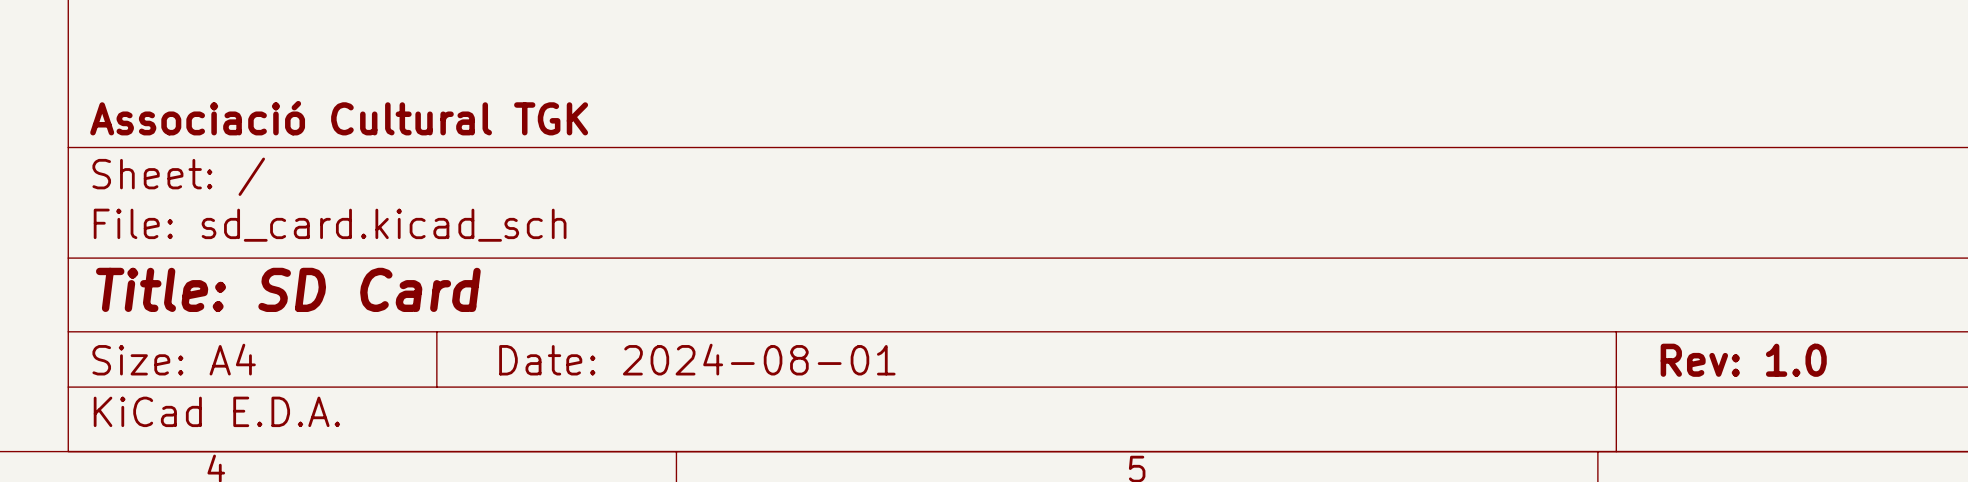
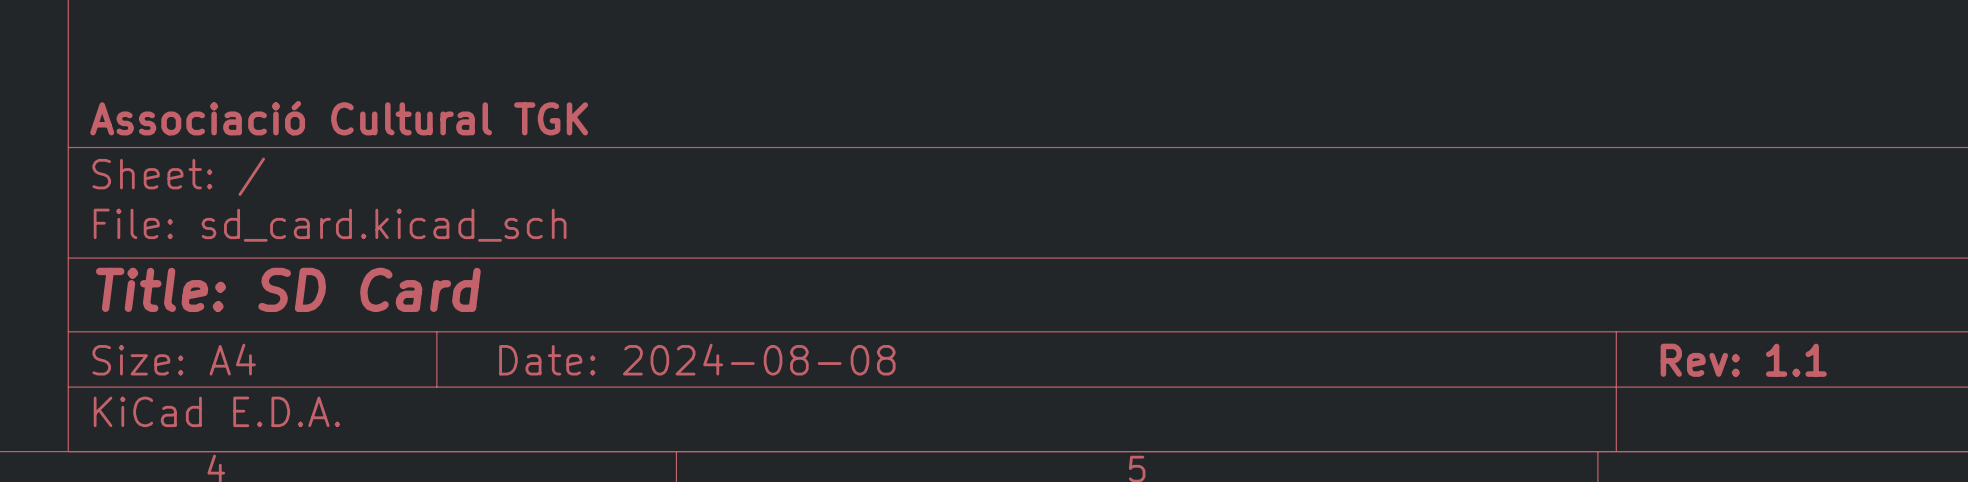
title block: Date: 2024-08-01 (697, 359) -> Date: 2024-08-08 (697, 359)
title block: Rev: 1.0 (1743, 360) -> Rev: 1.1 (1743, 360)

